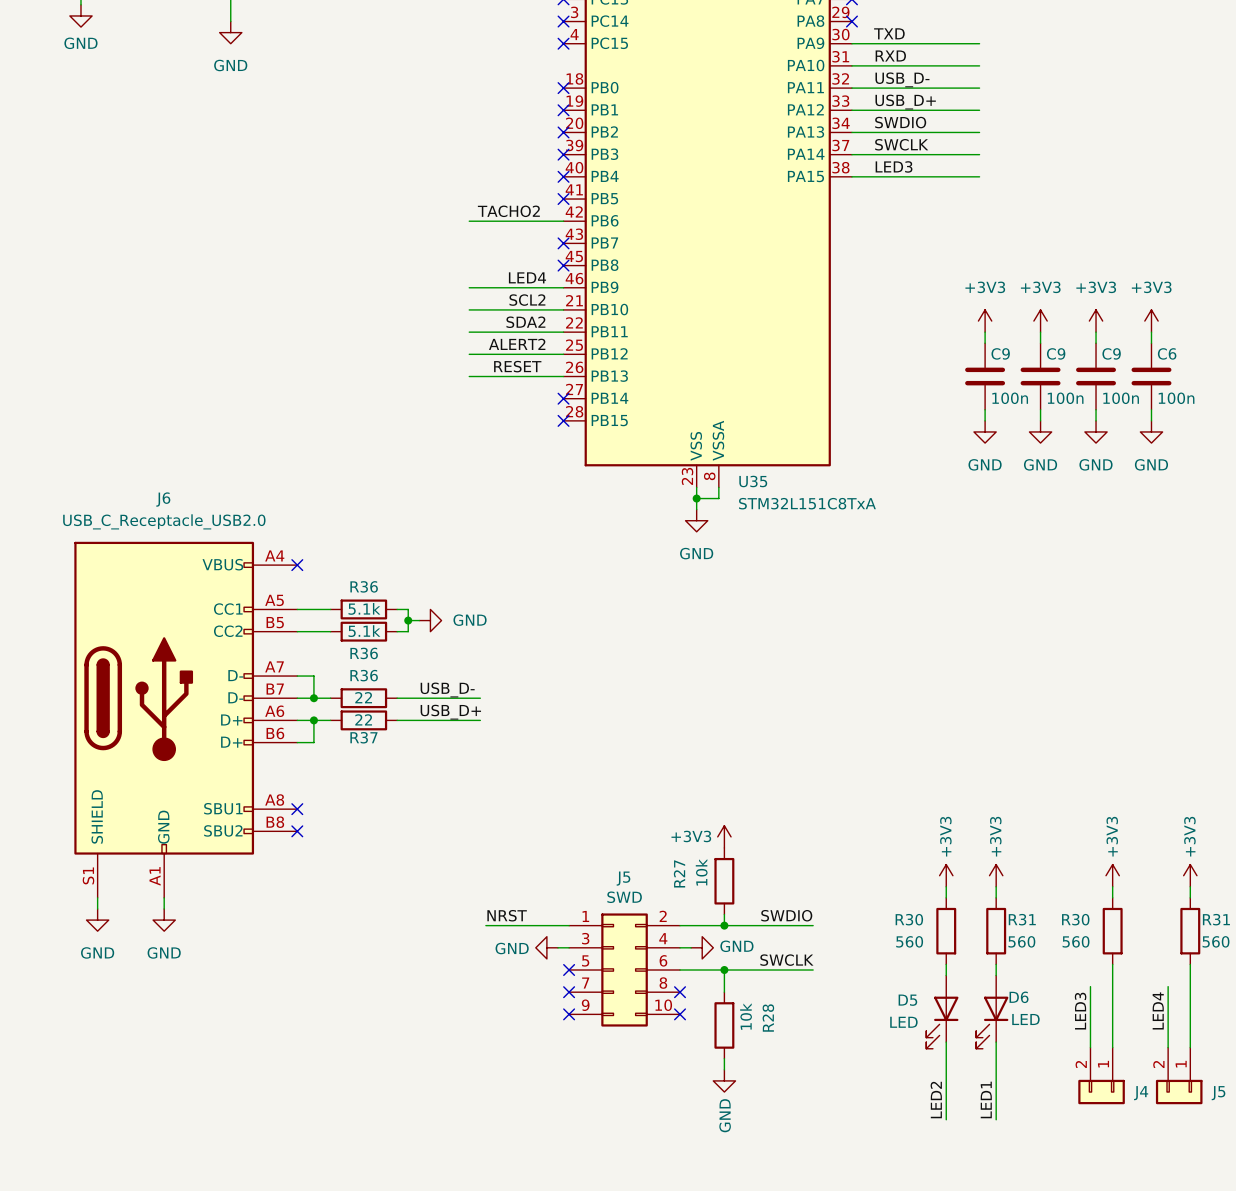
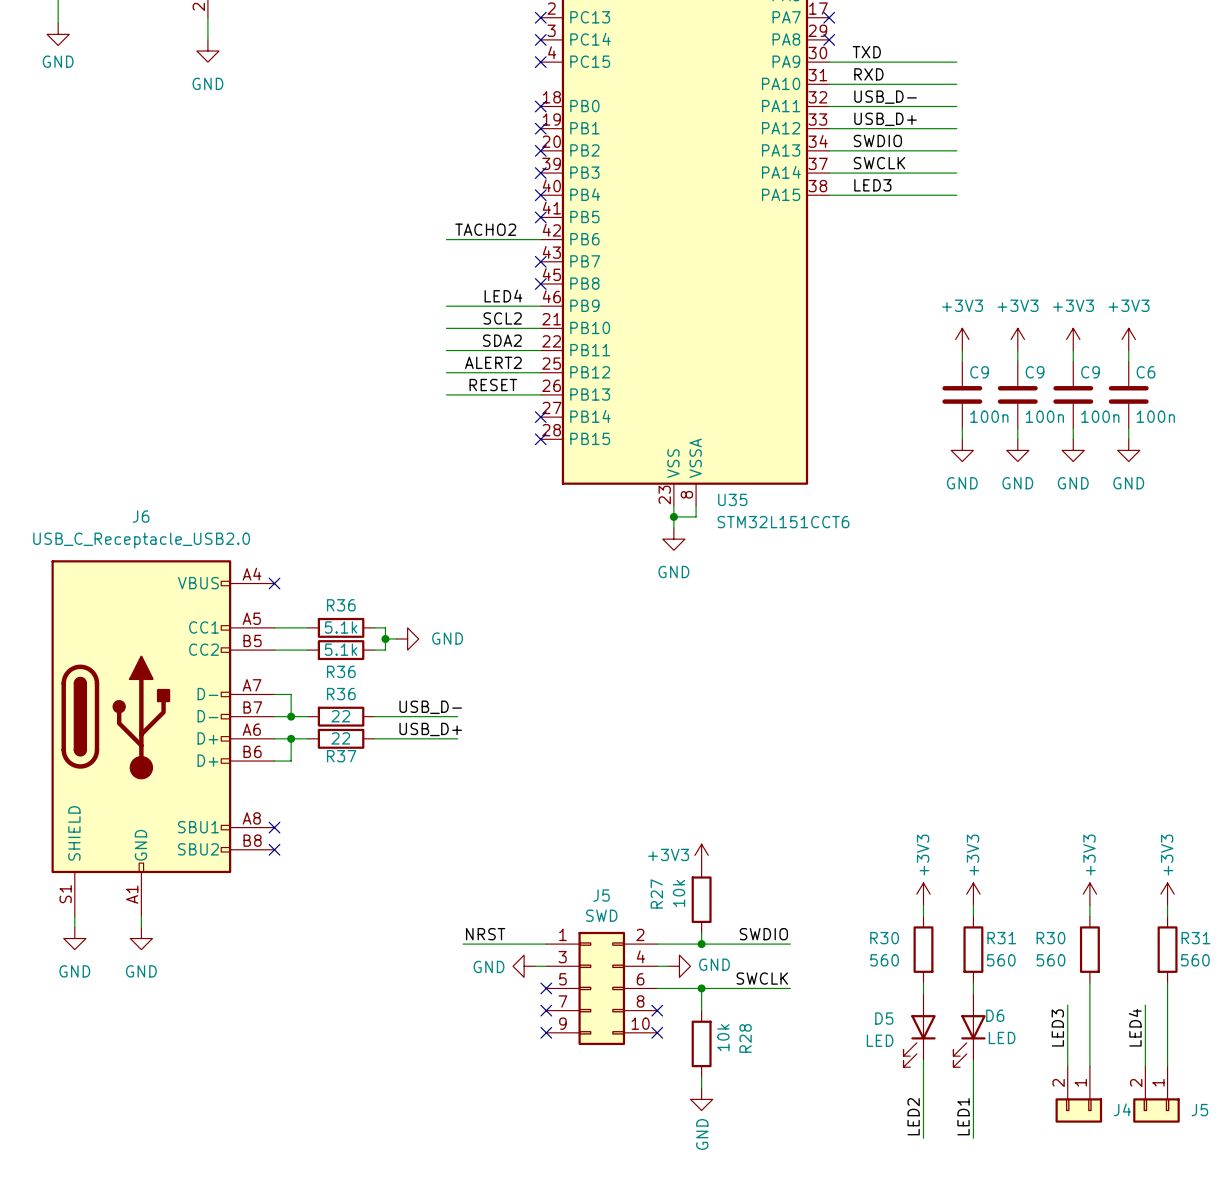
U35 value: STM32L151C8TxA (807, 503) -> STM32L151CCT6 (783, 522)

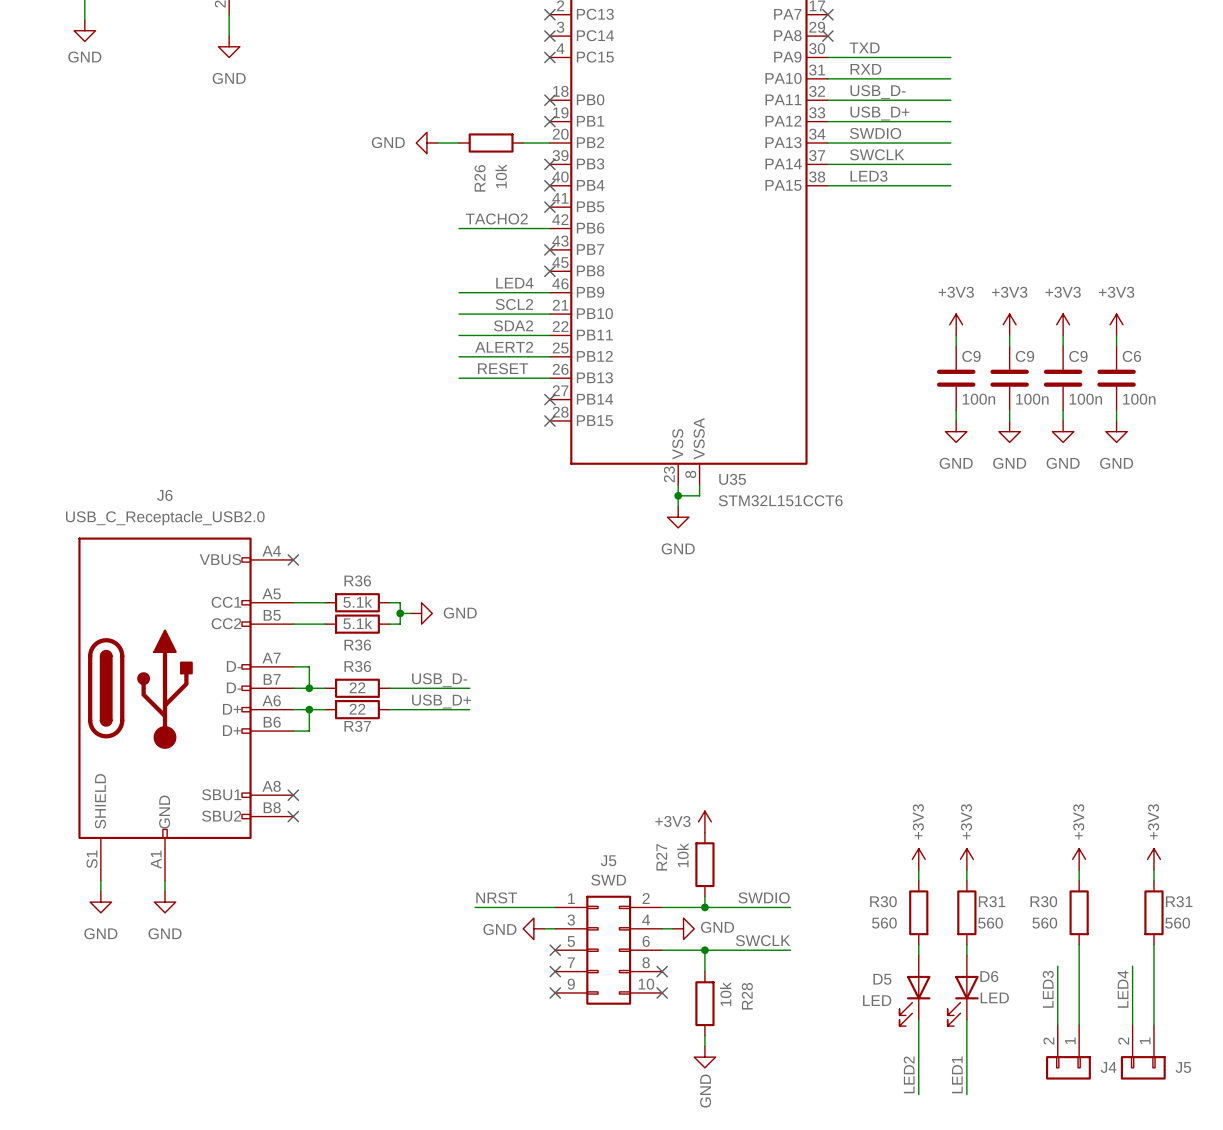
power symbol: none -> GND (426, 143)
wire: none -> (437, 143) (459, 143)
R26: none -> 10k (491, 143)
wire: none -> (523, 143) (549, 143)
no-connect mark: (540, 150) -> none

